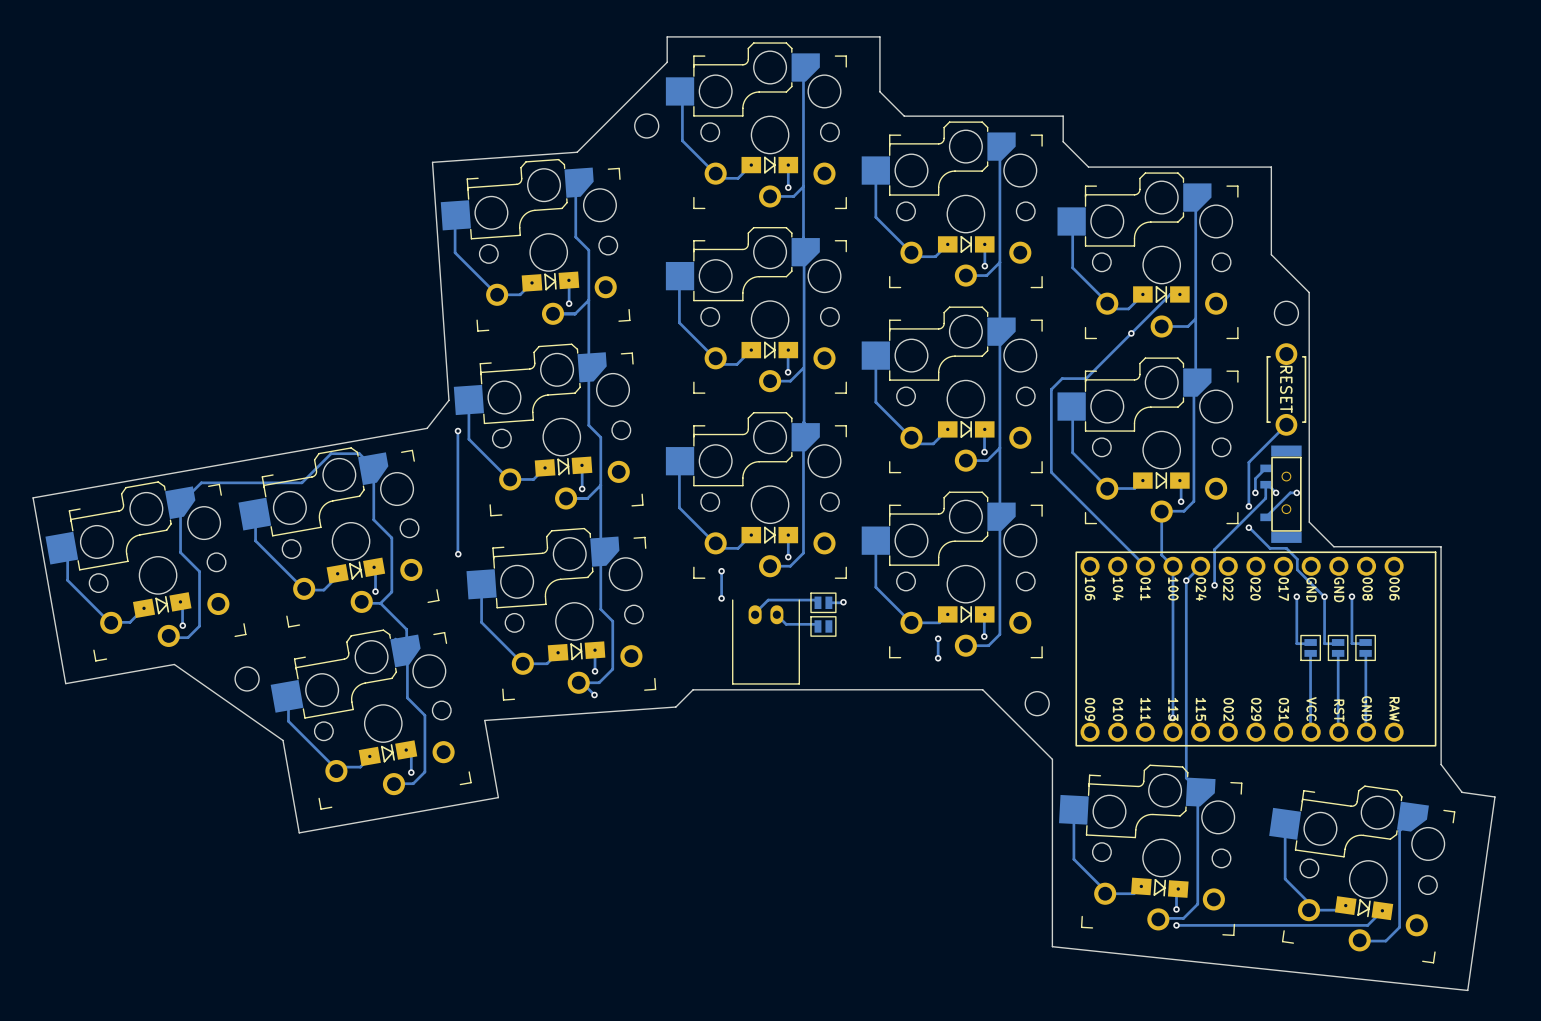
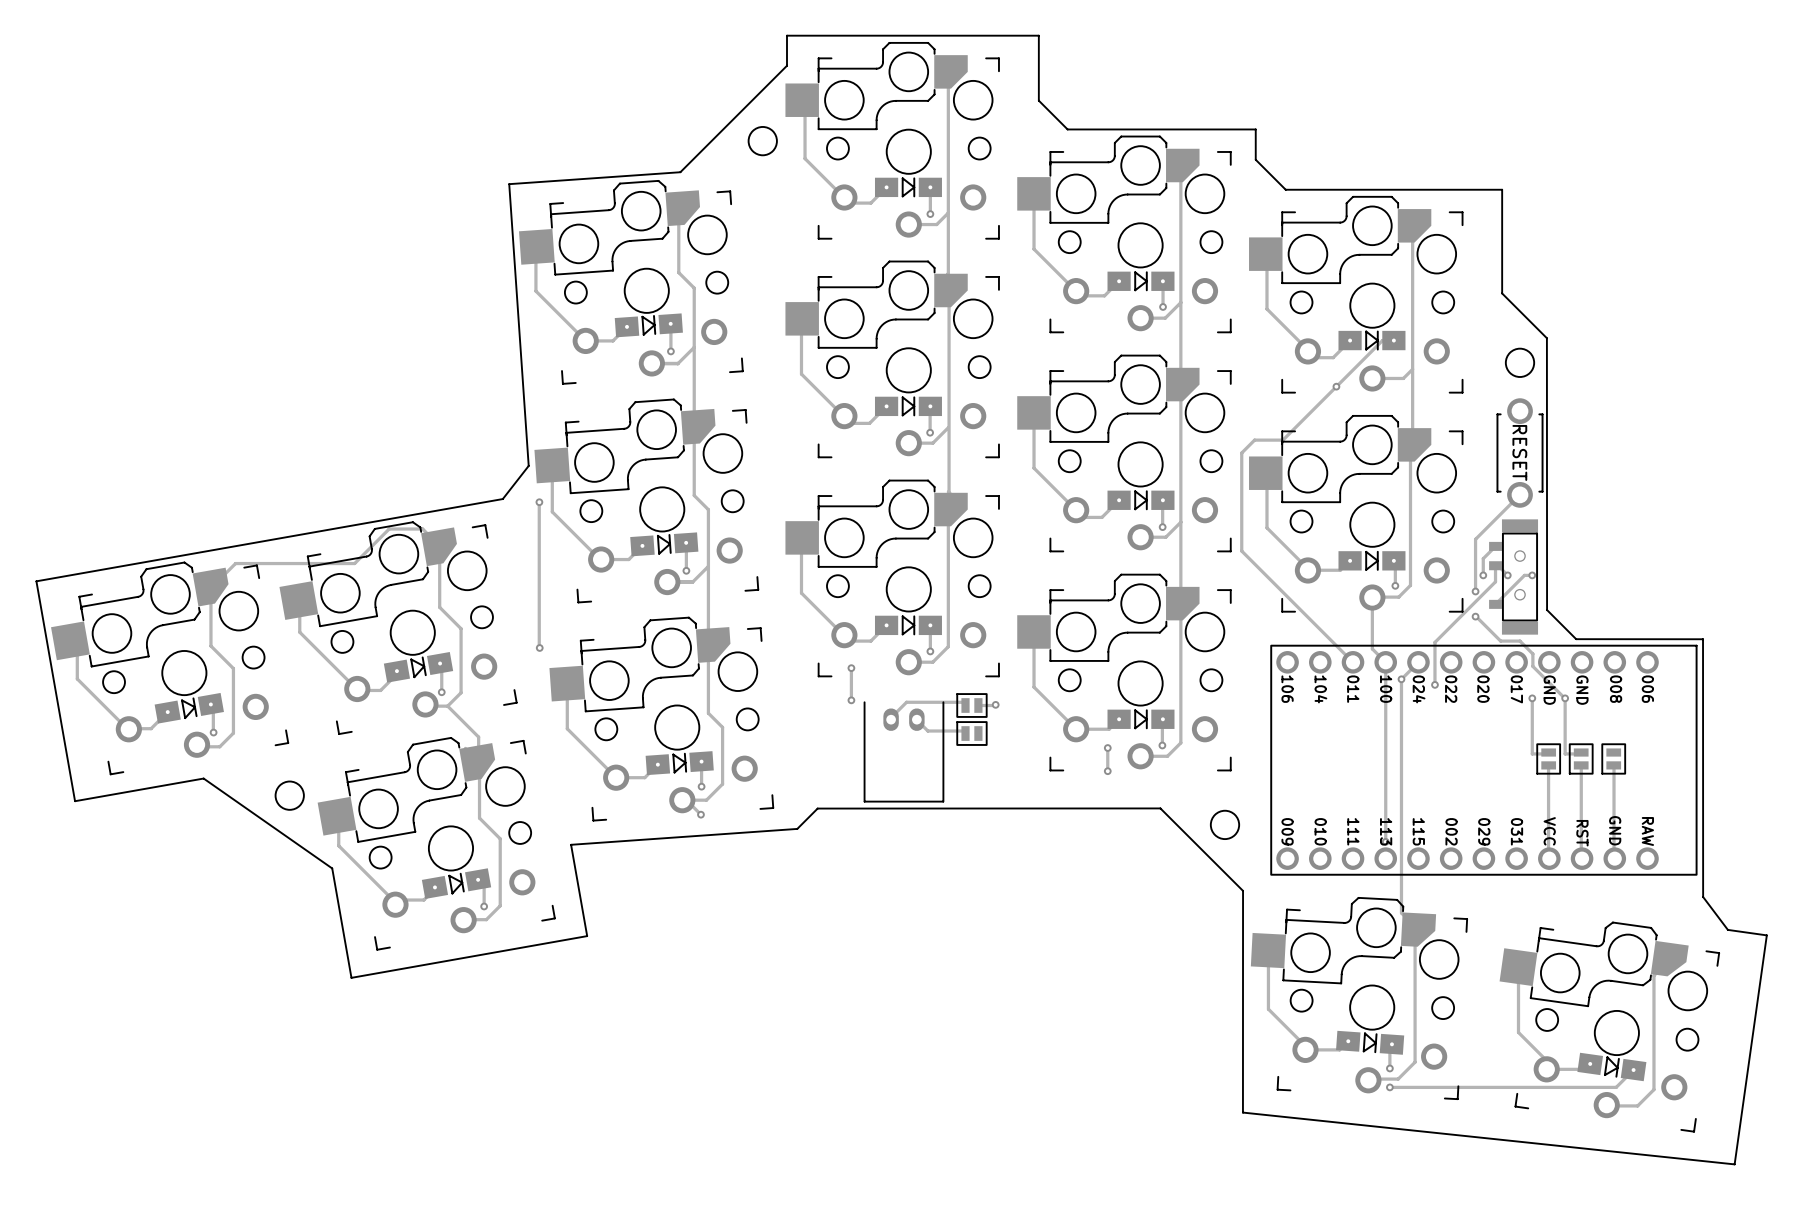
track: (1351, 596) (1351, 643) (1364, 643) -> none
via: (1351, 596) -> none

